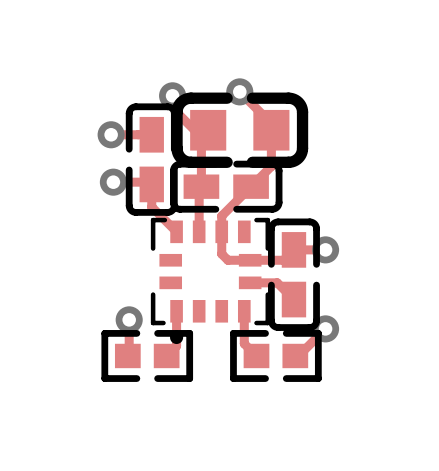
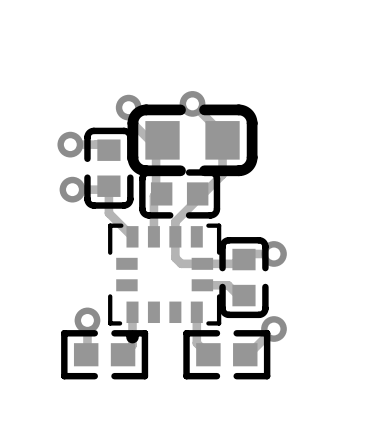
part footprint: [125, 103, 178, 216] -> [84, 127, 134, 209]
part footprint: [170, 160, 283, 213] -> [139, 169, 221, 219]
part footprint: [268, 218, 320, 331] -> [219, 237, 269, 319]

